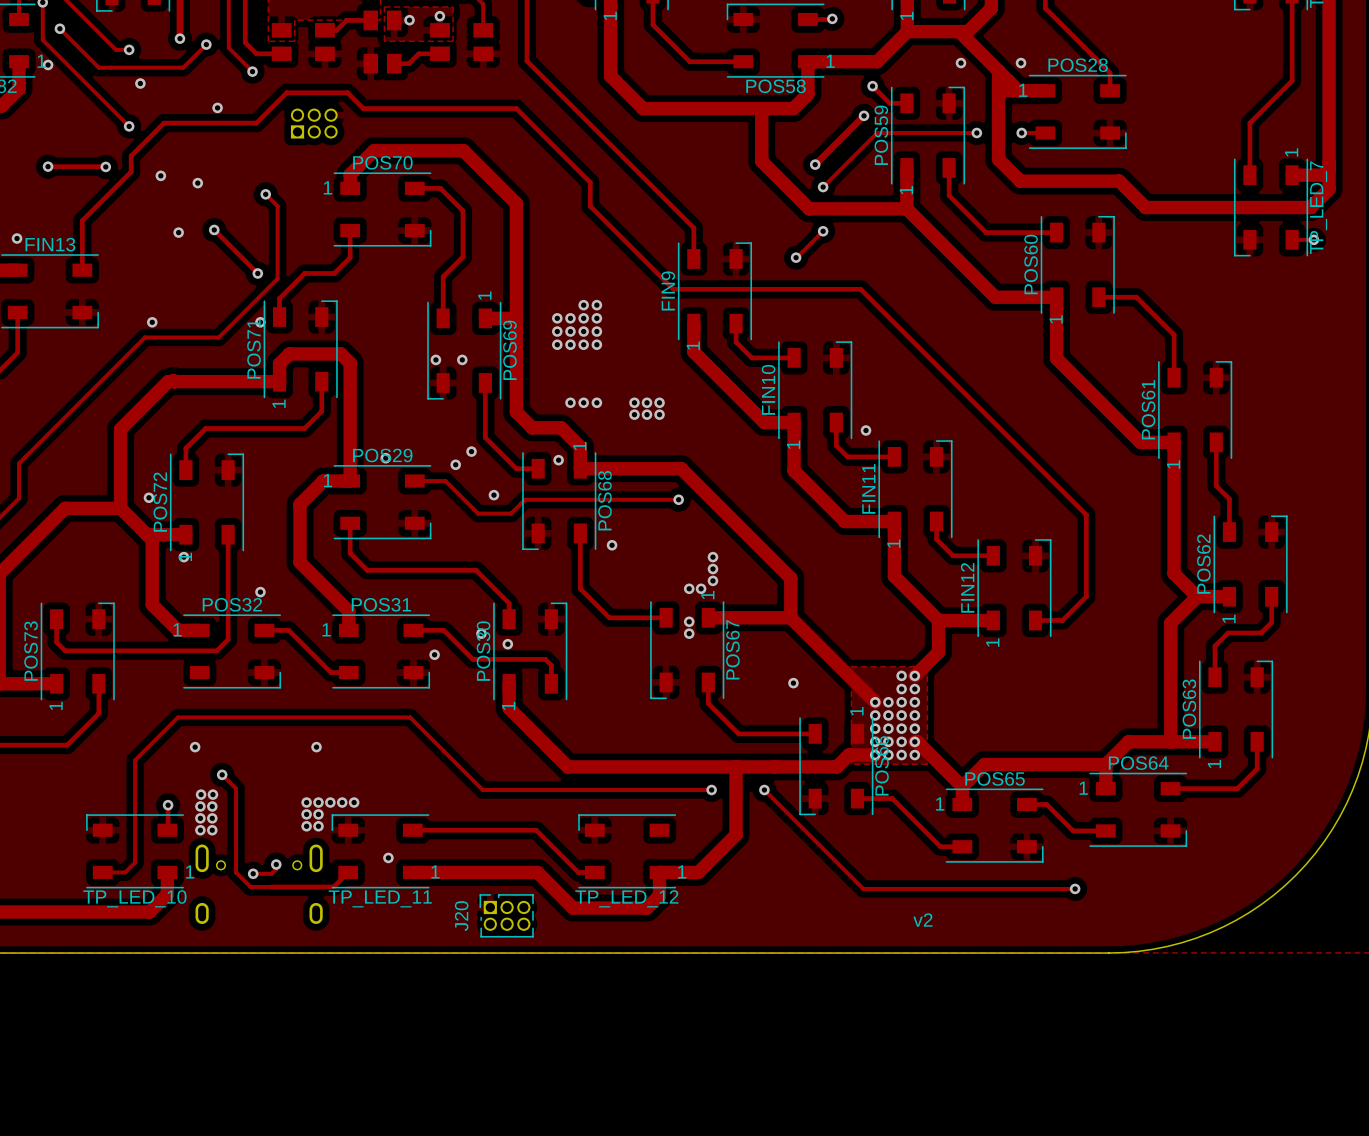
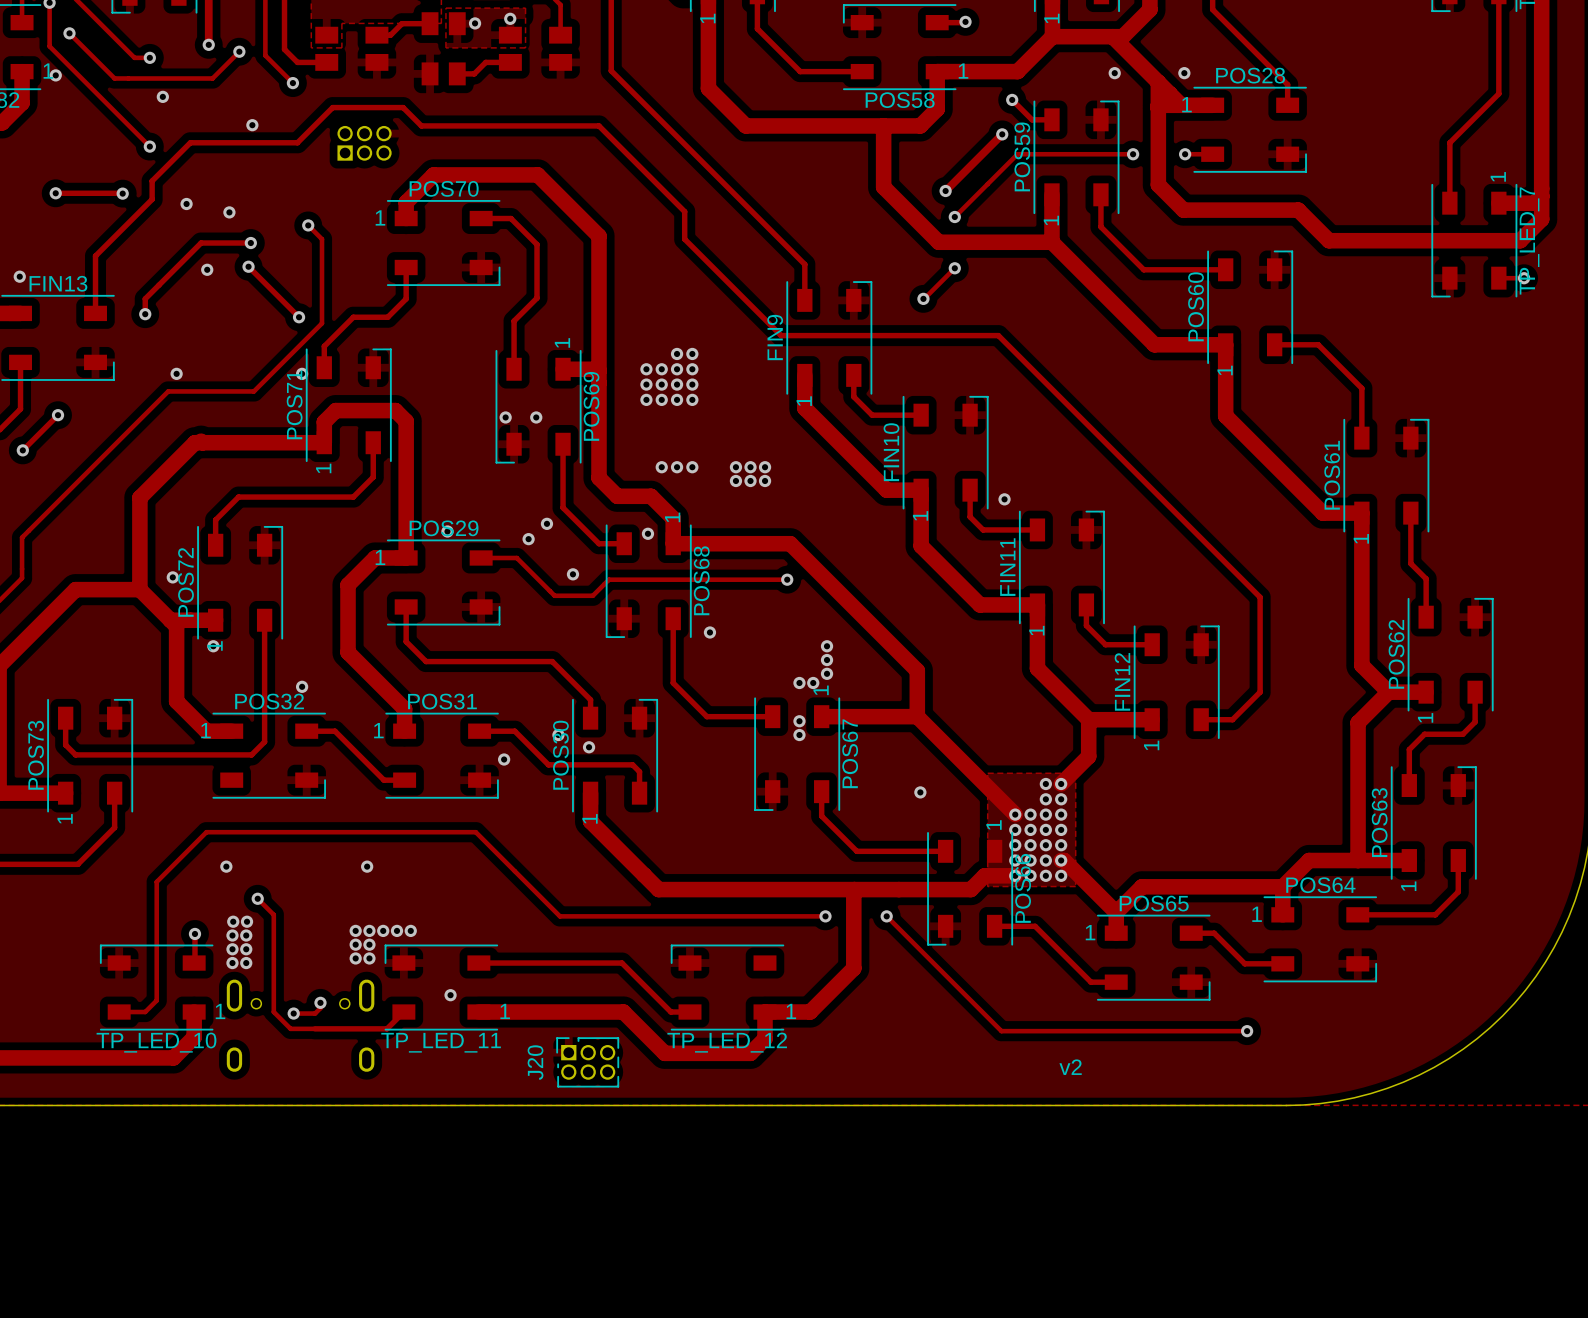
track: none -> (250, 243) (201, 243) (145, 298) (145, 314)
via: none -> (250, 243)
via: none -> (145, 314)
track: none -> (58, 415) (22, 450)
via: none -> (58, 415)
via: none -> (22, 450)

